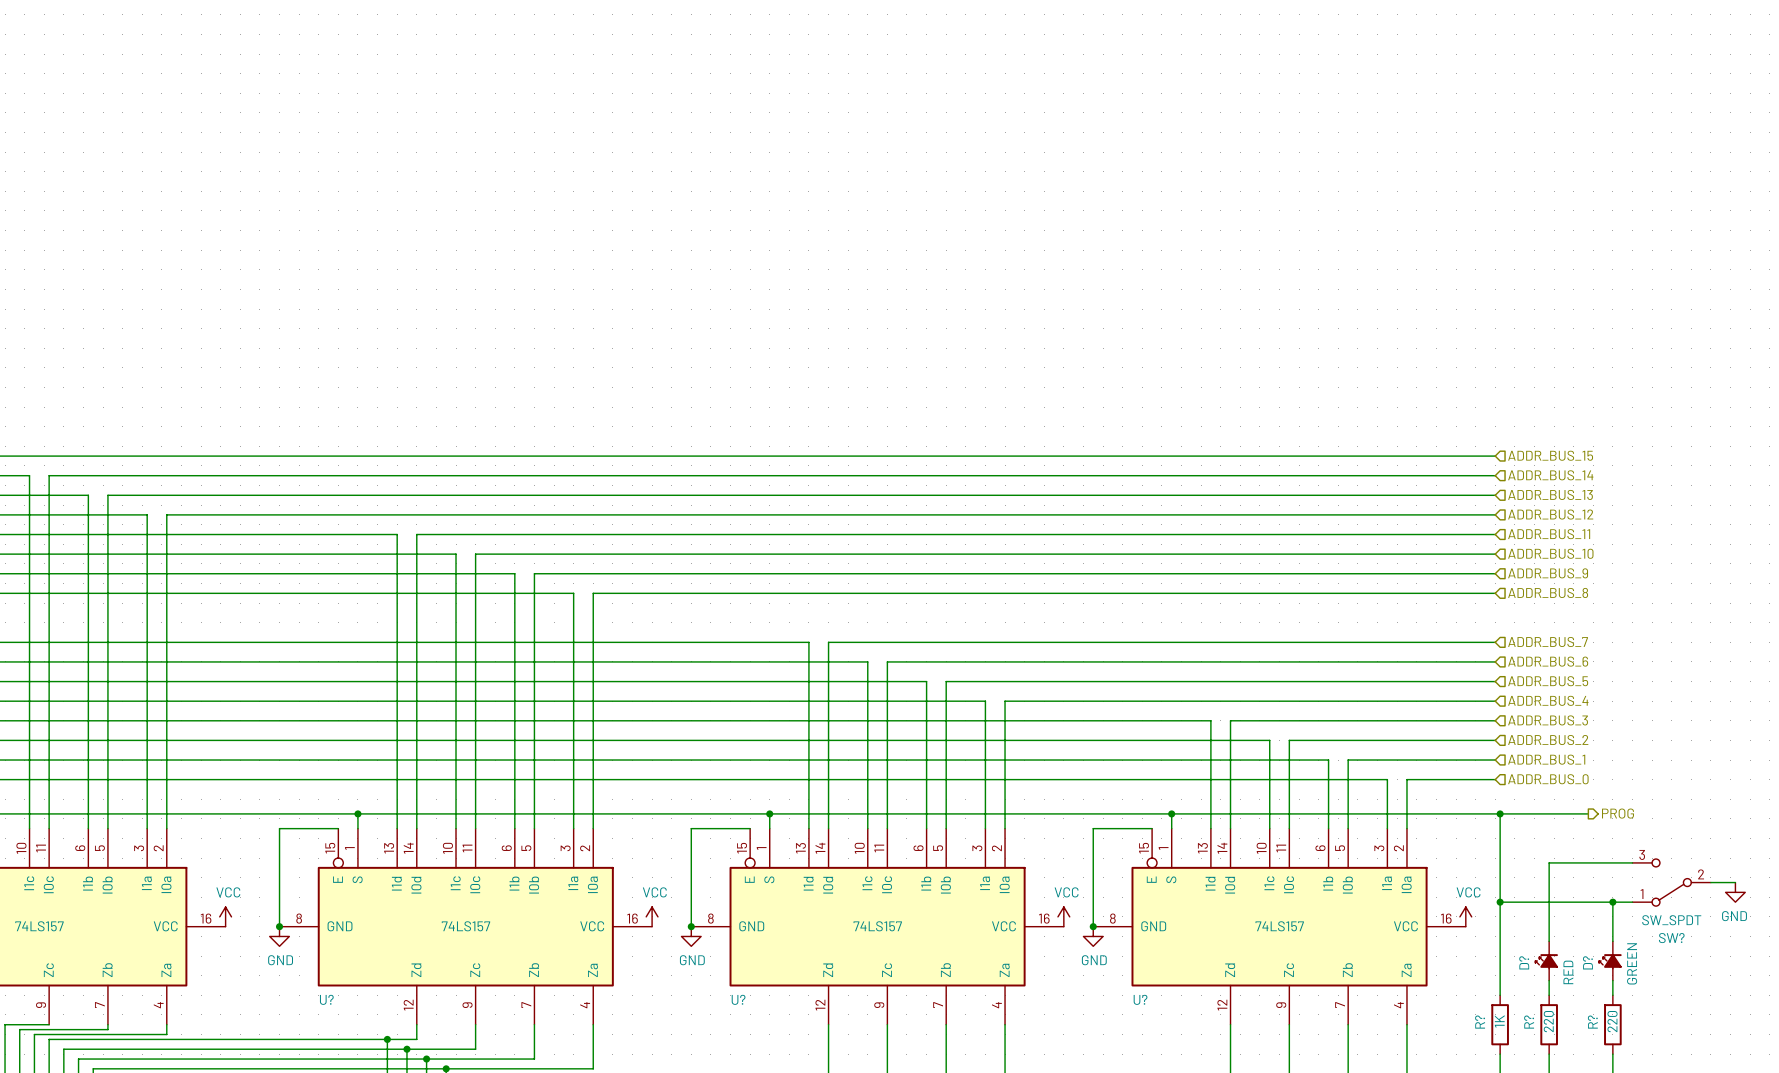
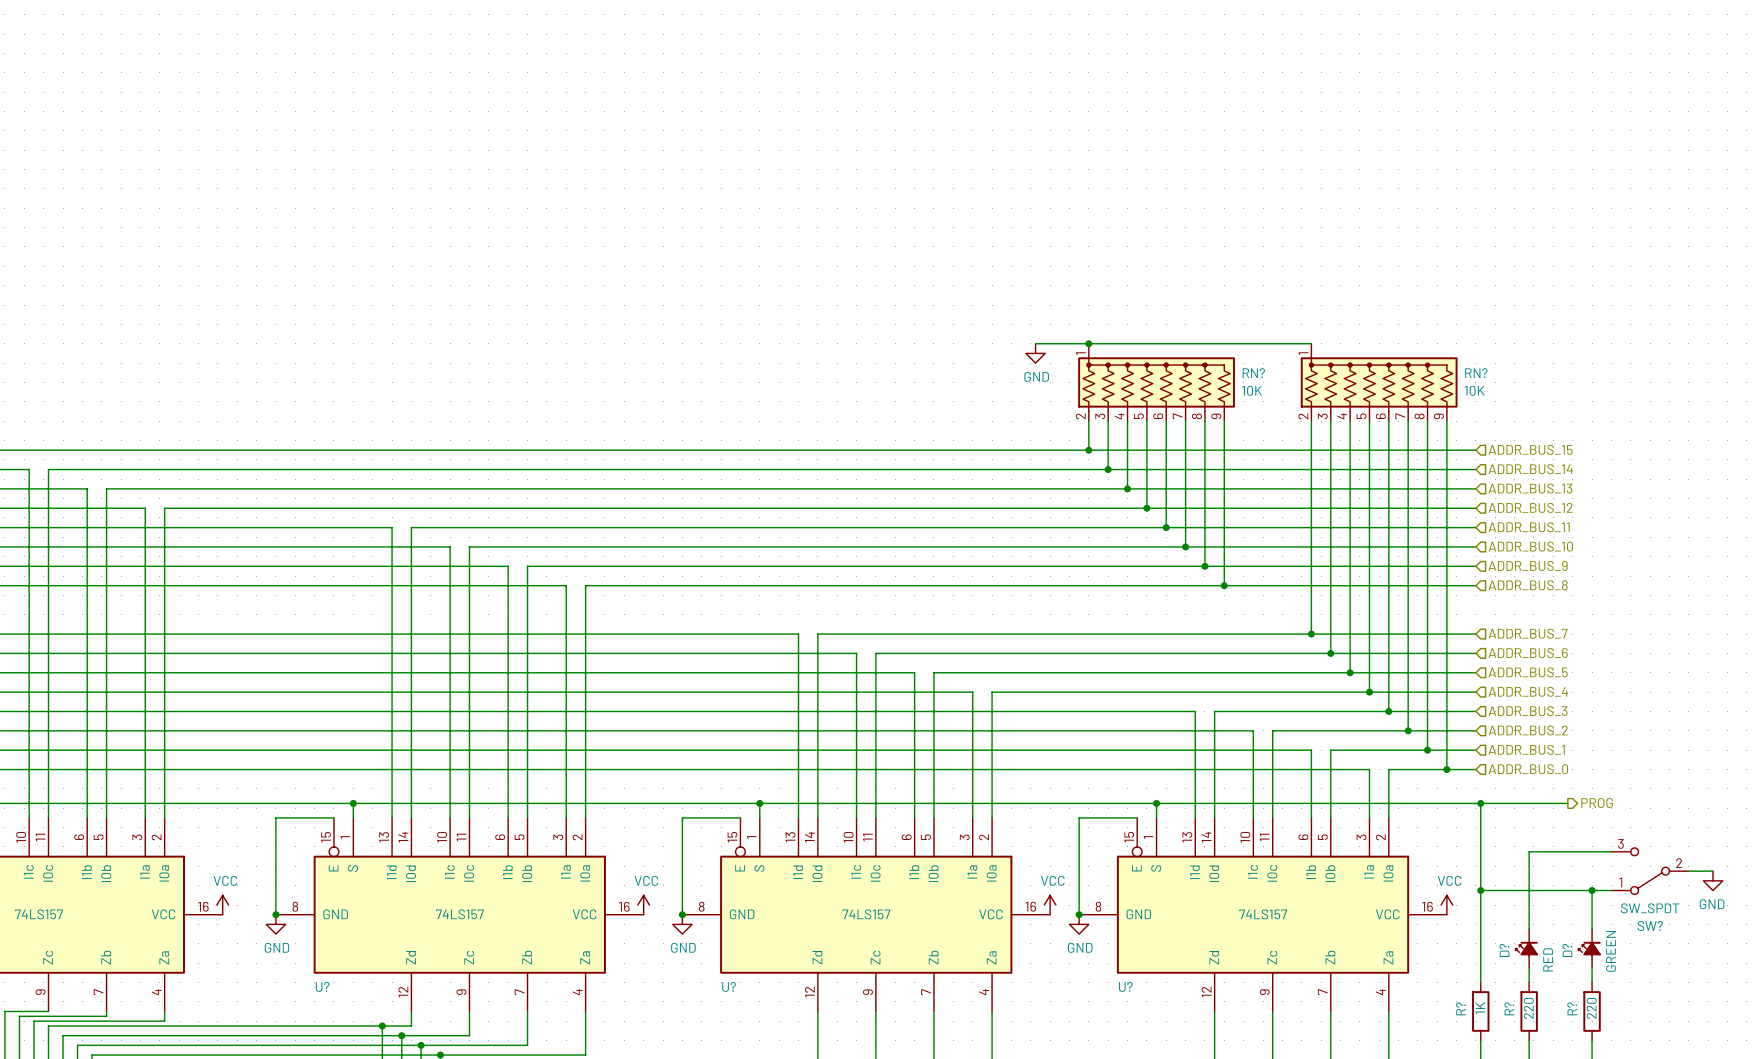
wire: none -> (1035, 343) (1311, 343)
junction: none -> (1088, 343)
power symbol: none -> GND (1035, 353)
RN?: none -> 10K (1156, 382)
RN?: none -> 10K (1379, 382)
wire: none -> (1088, 421) (1088, 450)
wire: none -> (1108, 421) (1108, 469)
wire: none -> (1127, 421) (1127, 488)
wire: none -> (1146, 421) (1146, 508)
wire: none -> (1166, 421) (1166, 527)
wire: none -> (1185, 421) (1185, 546)
wire: none -> (1204, 421) (1204, 566)
wire: none -> (1224, 421) (1224, 585)
wire: none -> (1311, 421) (1311, 634)
wire: none -> (1330, 421) (1330, 653)
wire: none -> (1350, 421) (1350, 672)
wire: none -> (1369, 421) (1369, 692)
wire: none -> (1388, 421) (1388, 711)
wire: none -> (1408, 421) (1408, 730)
wire: none -> (1427, 421) (1427, 750)
wire: none -> (1446, 421) (1446, 769)
junction: none -> (1088, 450)
junction: none -> (1108, 469)
junction: none -> (1127, 488)
junction: none -> (1146, 508)
junction: none -> (1166, 527)
junction: none -> (1185, 546)
junction: none -> (1204, 566)
junction: none -> (1224, 585)
junction: none -> (1311, 634)
junction: none -> (1330, 653)
junction: none -> (1350, 672)
junction: none -> (1369, 692)
junction: none -> (1388, 711)
junction: none -> (1408, 730)
junction: none -> (1427, 750)
junction: none -> (1446, 769)

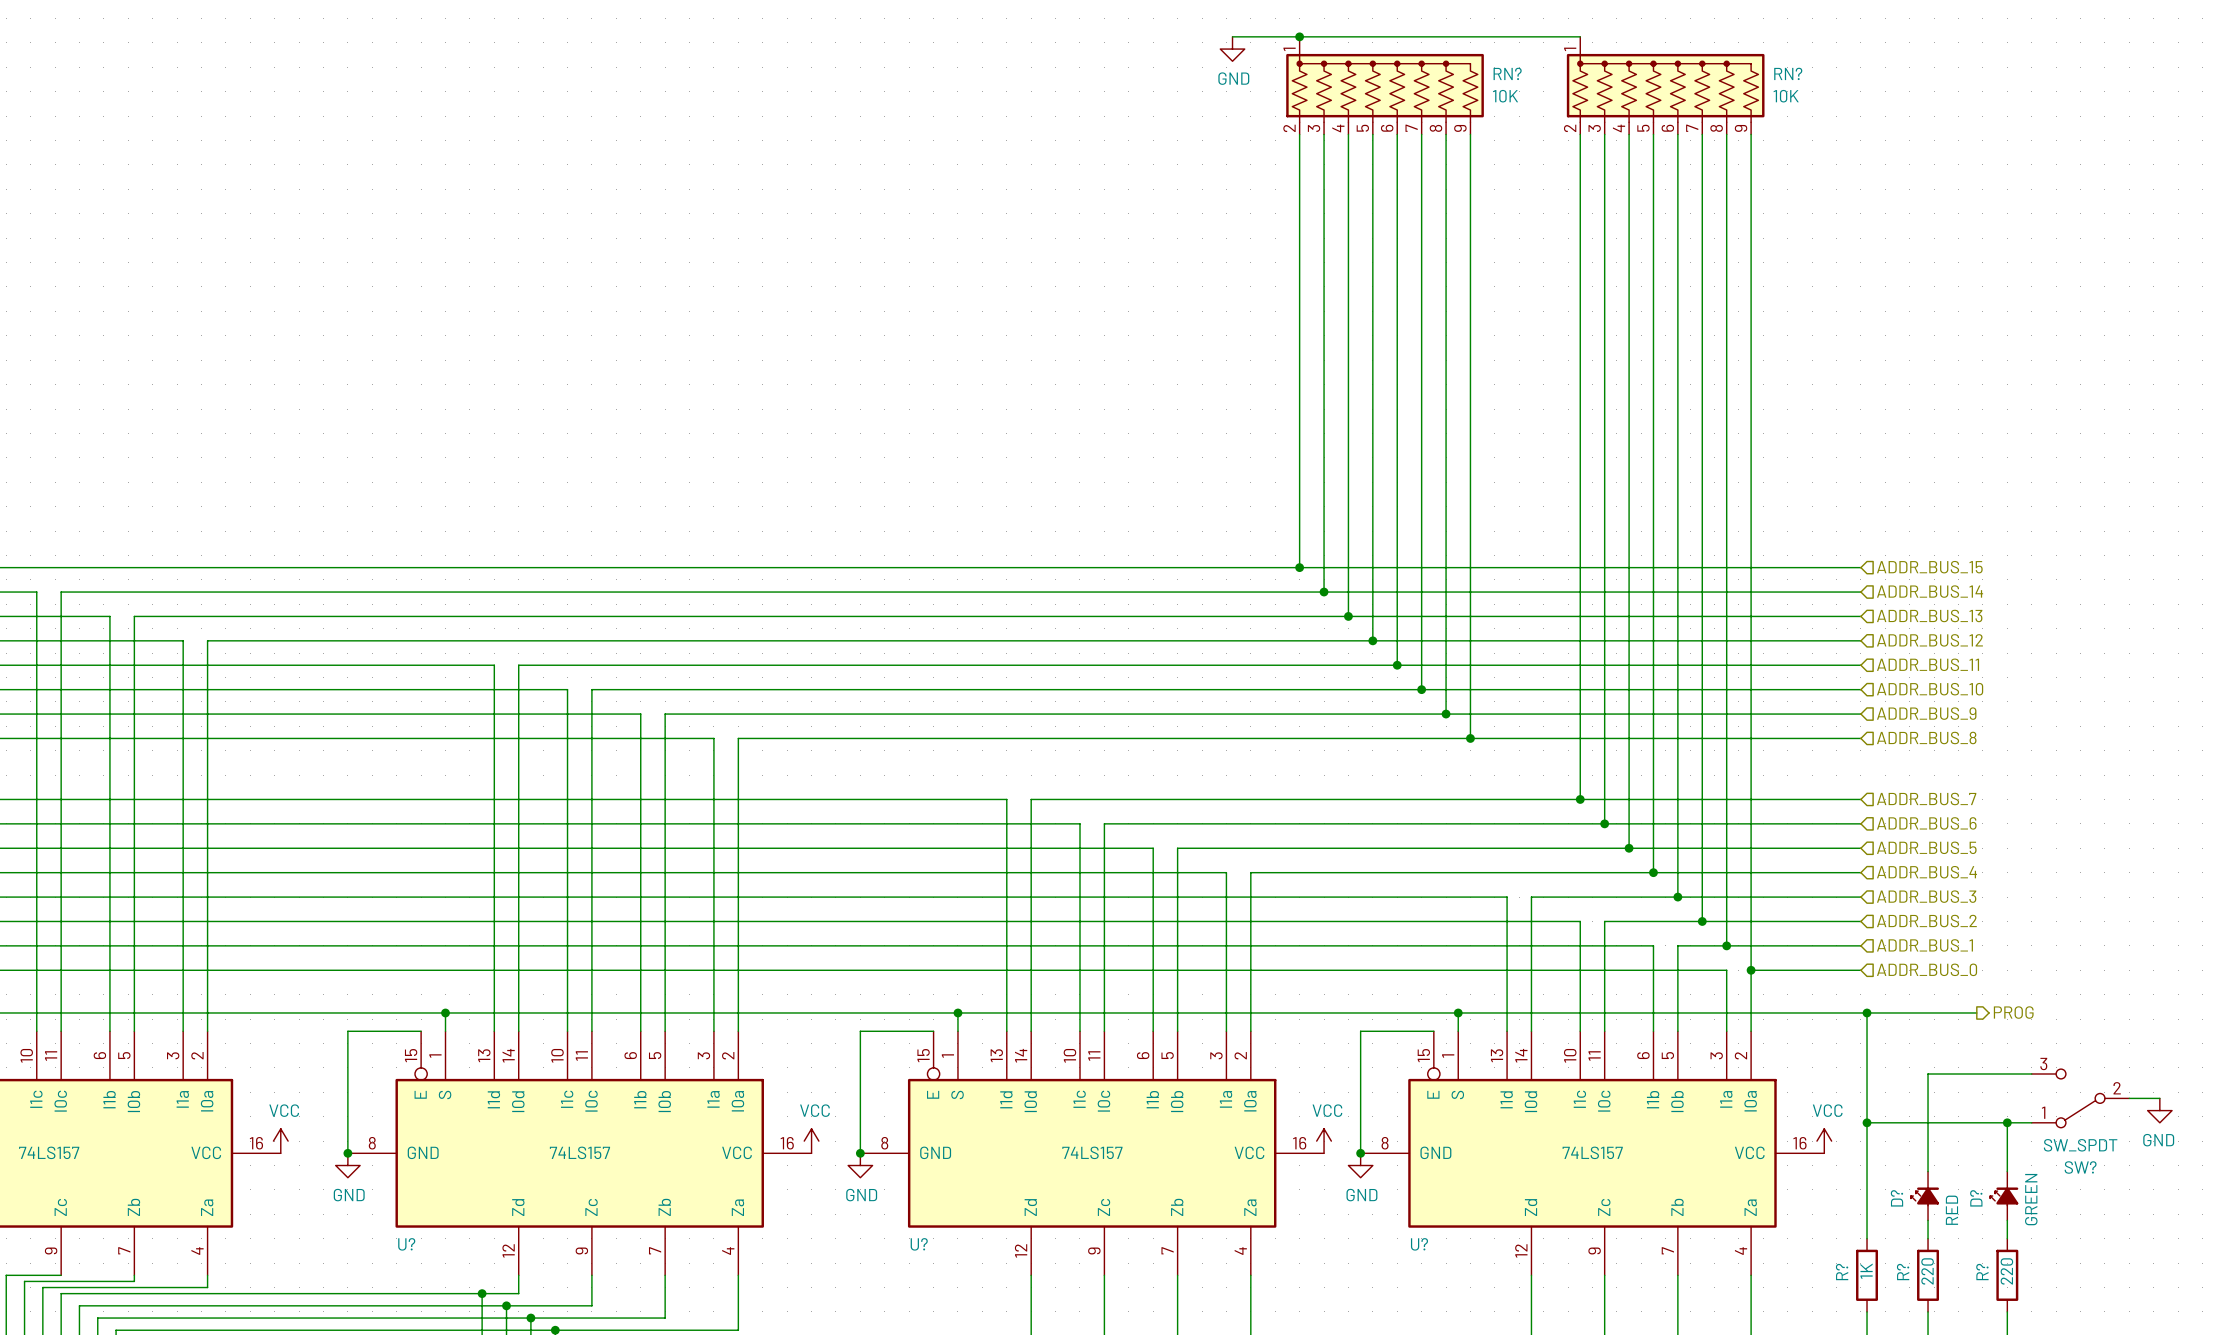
wire: none -> (1232, 36) (1580, 36)
junction: none -> (1299, 36)
power symbol: none -> GND (1232, 49)
RN?: none -> 10K (1385, 85)
RN?: none -> 10K (1665, 85)
wire: none -> (1299, 134) (1299, 567)
wire: none -> (1324, 134) (1324, 592)
wire: none -> (1348, 134) (1348, 616)
wire: none -> (1372, 134) (1372, 531)
wire: none -> (1397, 134) (1397, 531)
wire: none -> (1421, 134) (1421, 531)
wire: none -> (1446, 134) (1446, 531)
wire: none -> (1470, 134) (1470, 531)
wire: none -> (1580, 134) (1580, 799)
wire: none -> (1604, 134) (1604, 823)
wire: none -> (1629, 134) (1629, 848)
wire: none -> (1653, 134) (1653, 531)
wire: none -> (1677, 134) (1677, 531)
wire: none -> (1702, 134) (1702, 531)
wire: none -> (1726, 134) (1726, 531)
wire: none -> (1751, 134) (1751, 531)
wire: (1035, 343) (1311, 343) -> none
junction: (1088, 343) -> none
power symbol: GND (1035, 353) -> none
RN?: 10K (1156, 382) -> none
RN?: 10K (1379, 382) -> none
wire: (1185, 421) (1185, 546) -> none
wire: (1204, 421) (1204, 566) -> none
wire: (1224, 421) (1224, 585) -> none
wire: (1408, 421) (1408, 730) -> none
wire: (1427, 421) (1427, 750) -> none
wire: (1446, 421) (1446, 769) -> none
junction: none -> (1299, 567)
wire: none -> (1372, 567) (1372, 640)
junction: (1088, 450) -> none
junction: none -> (1324, 592)
wire: none -> (1397, 592) (1397, 665)
junction: (1108, 469) -> none
junction: none -> (1348, 616)
wire: none -> (1421, 616) (1421, 689)
junction: (1127, 488) -> none
junction: none -> (1372, 640)
wire: none -> (1446, 640) (1446, 714)
junction: (1146, 508) -> none
junction: none -> (1397, 665)
wire: none -> (1470, 665) (1470, 738)
junction: (1166, 527) -> none
junction: none -> (1421, 689)
junction: (1185, 546) -> none
junction: none -> (1446, 714)
junction: (1204, 566) -> none
junction: none -> (1470, 738)
junction: (1224, 585) -> none
junction: none -> (1580, 799)
wire: none -> (1653, 799) (1653, 872)
junction: (1311, 634) -> none
junction: none -> (1604, 823)
wire: none -> (1677, 823) (1677, 897)
junction: (1330, 653) -> none
junction: none -> (1629, 848)
wire: none -> (1702, 848) (1702, 921)
junction: (1350, 672) -> none
junction: none -> (1653, 872)
wire: none -> (1726, 872) (1726, 945)
junction: (1369, 692) -> none
junction: none -> (1677, 897)
wire: none -> (1751, 897) (1751, 970)
junction: (1388, 711) -> none
junction: none -> (1702, 921)
junction: (1408, 730) -> none
junction: none -> (1726, 945)
junction: (1427, 750) -> none
junction: none -> (1751, 970)
junction: (1446, 769) -> none

